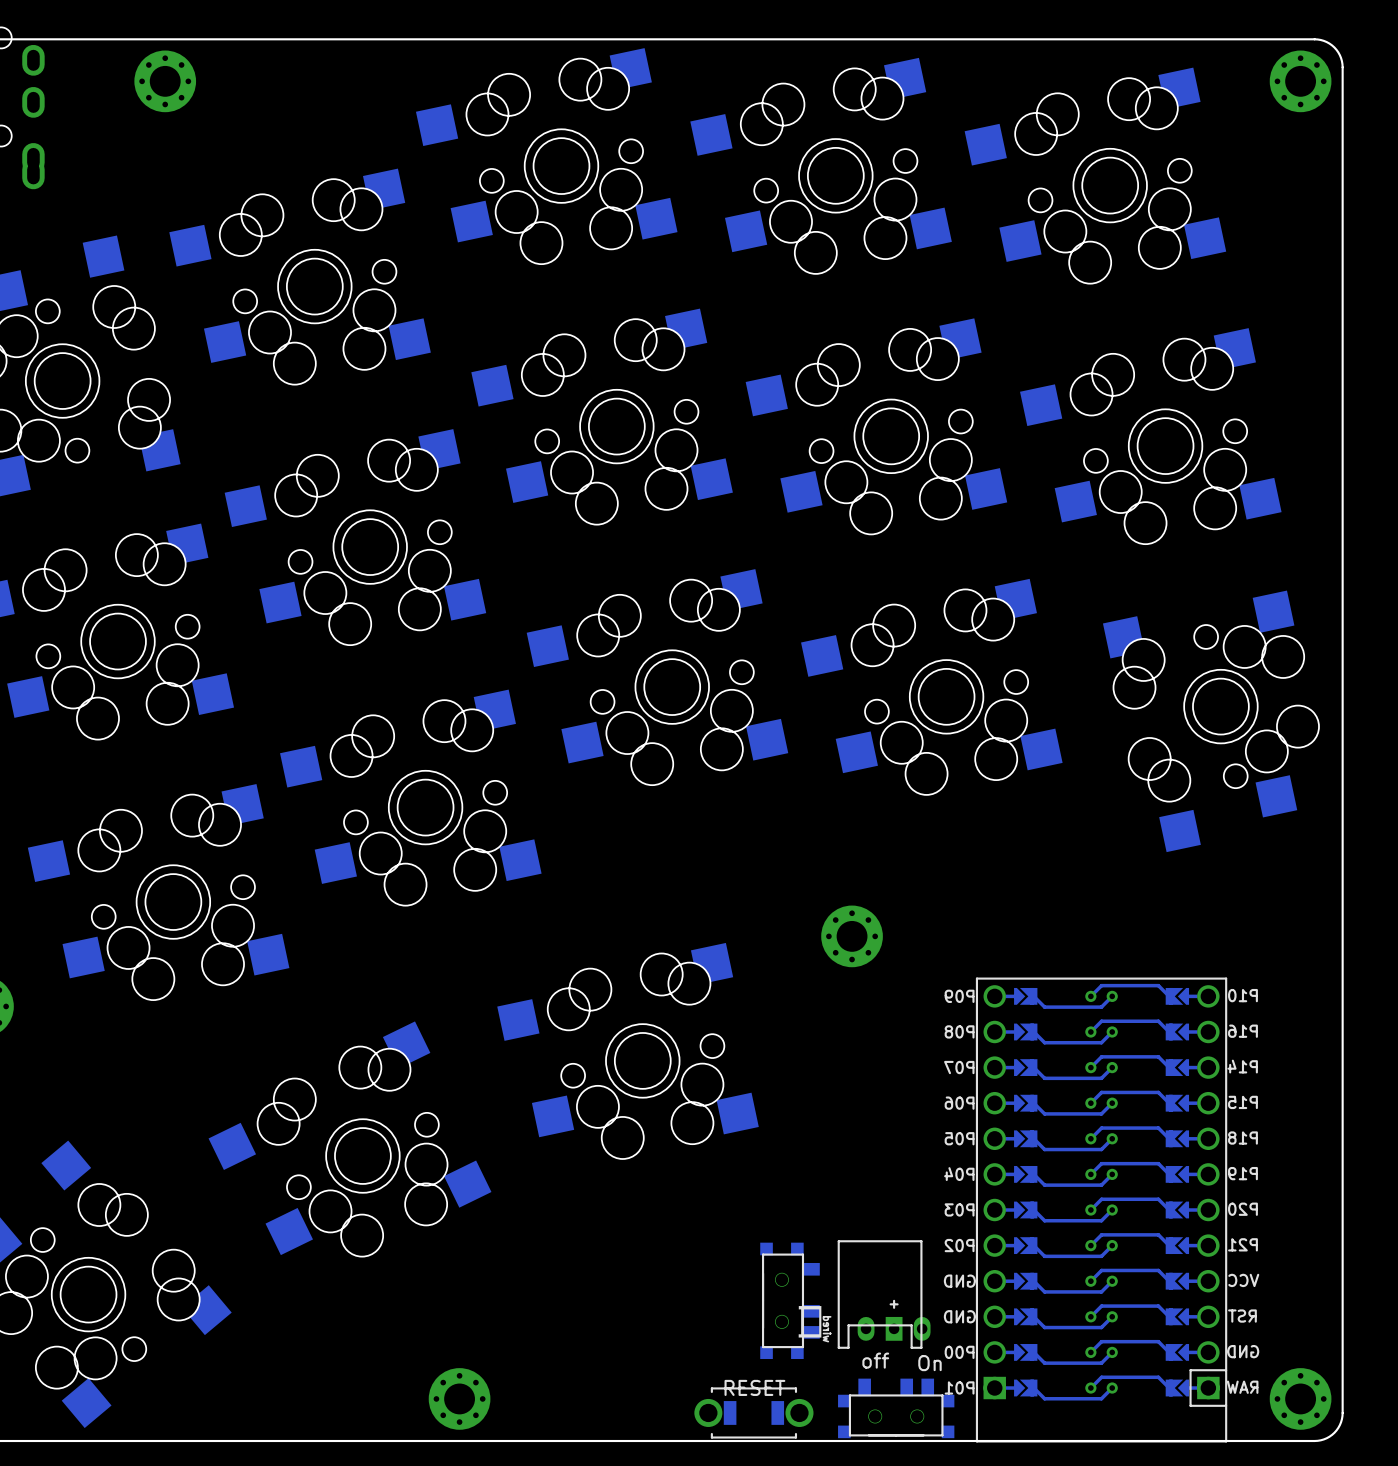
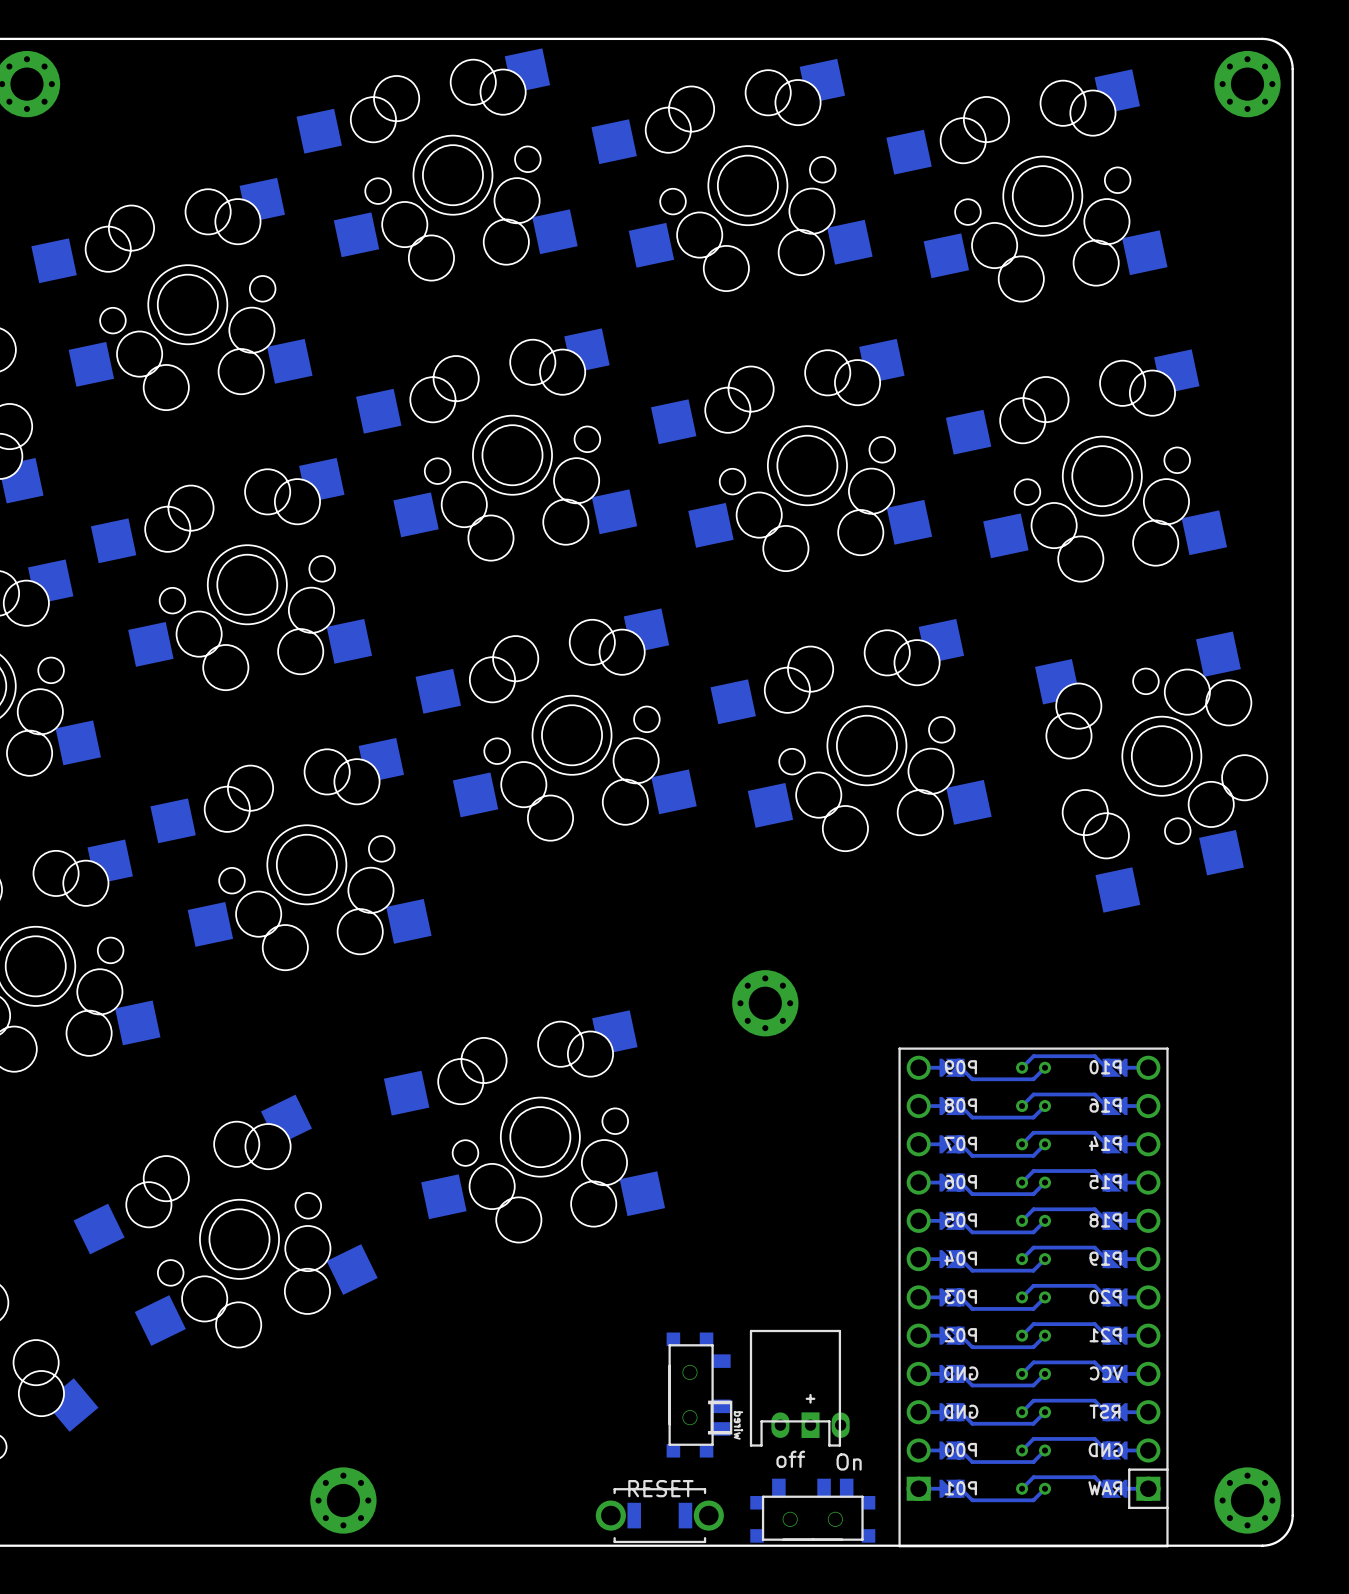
part footprint: [975, 977, 1228, 1443] -> [898, 1047, 1169, 1548]

